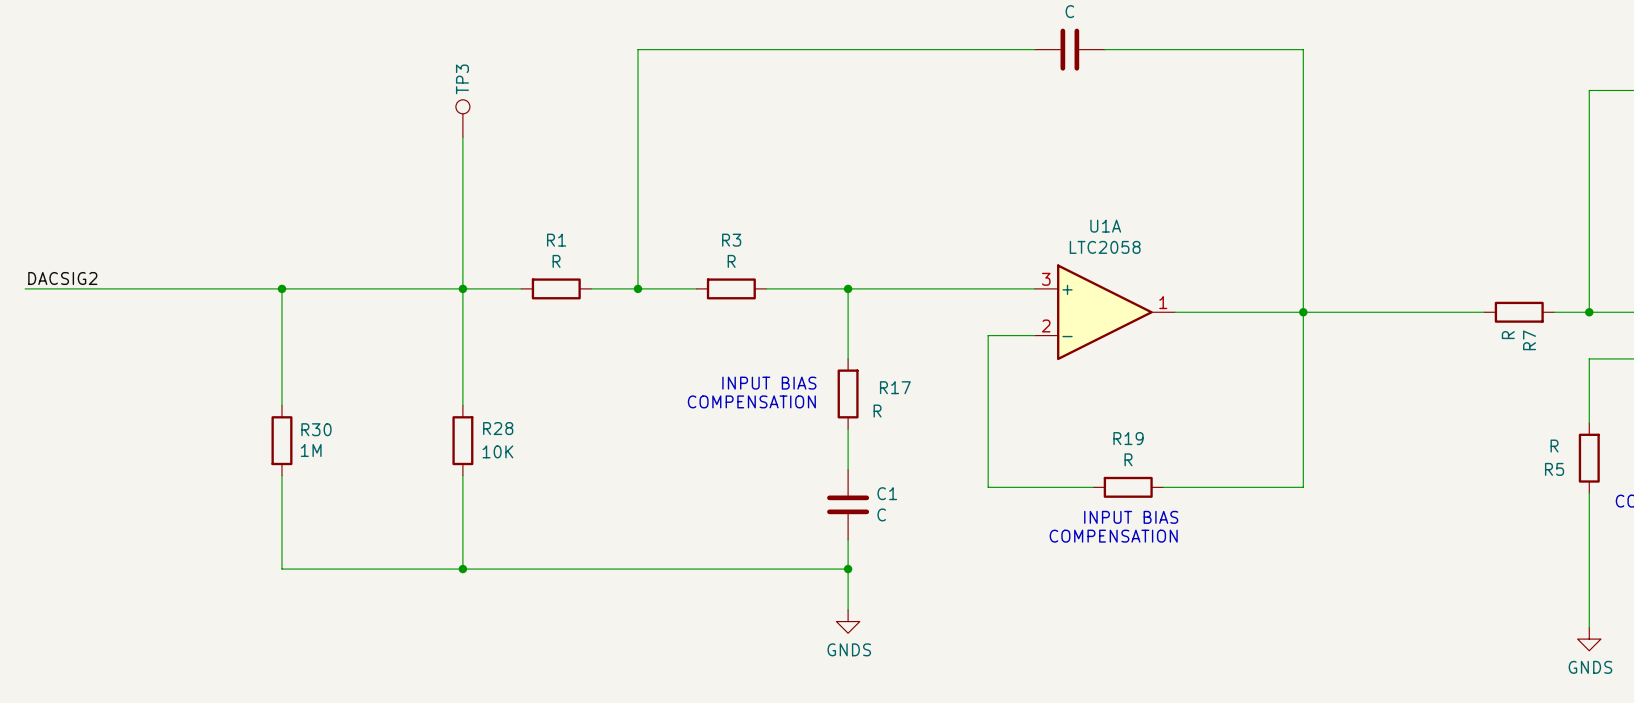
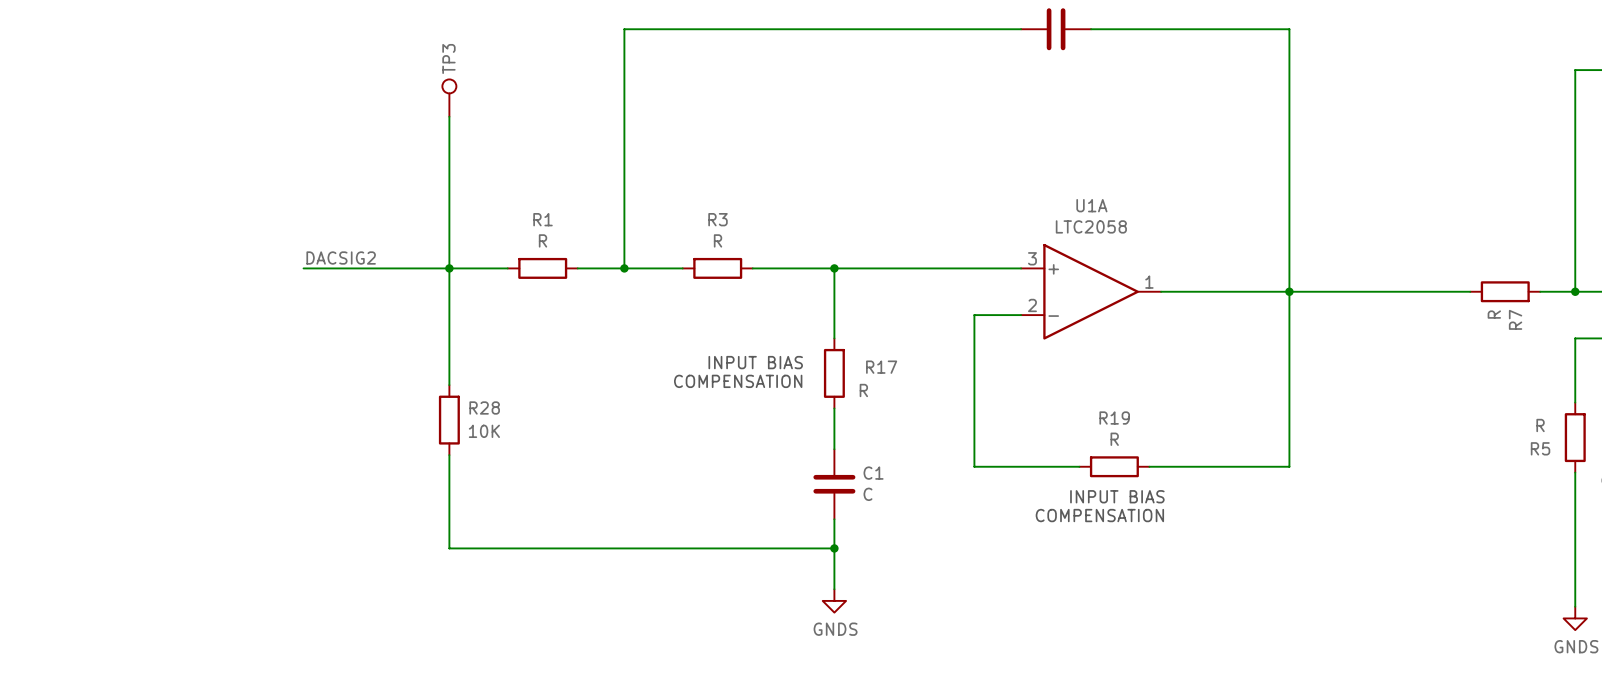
label: DACSIG2 (62, 278) -> none
label: none -> DACSIG2 (341, 258)
wire: (25, 288) (317, 288) -> none
wire: (281, 288) (281, 405) -> none
junction: (281, 288) -> none
R30: 1M (281, 440) -> none
wire: (281, 475) (281, 569) (462, 569) -> none
junction: (462, 569) -> none

